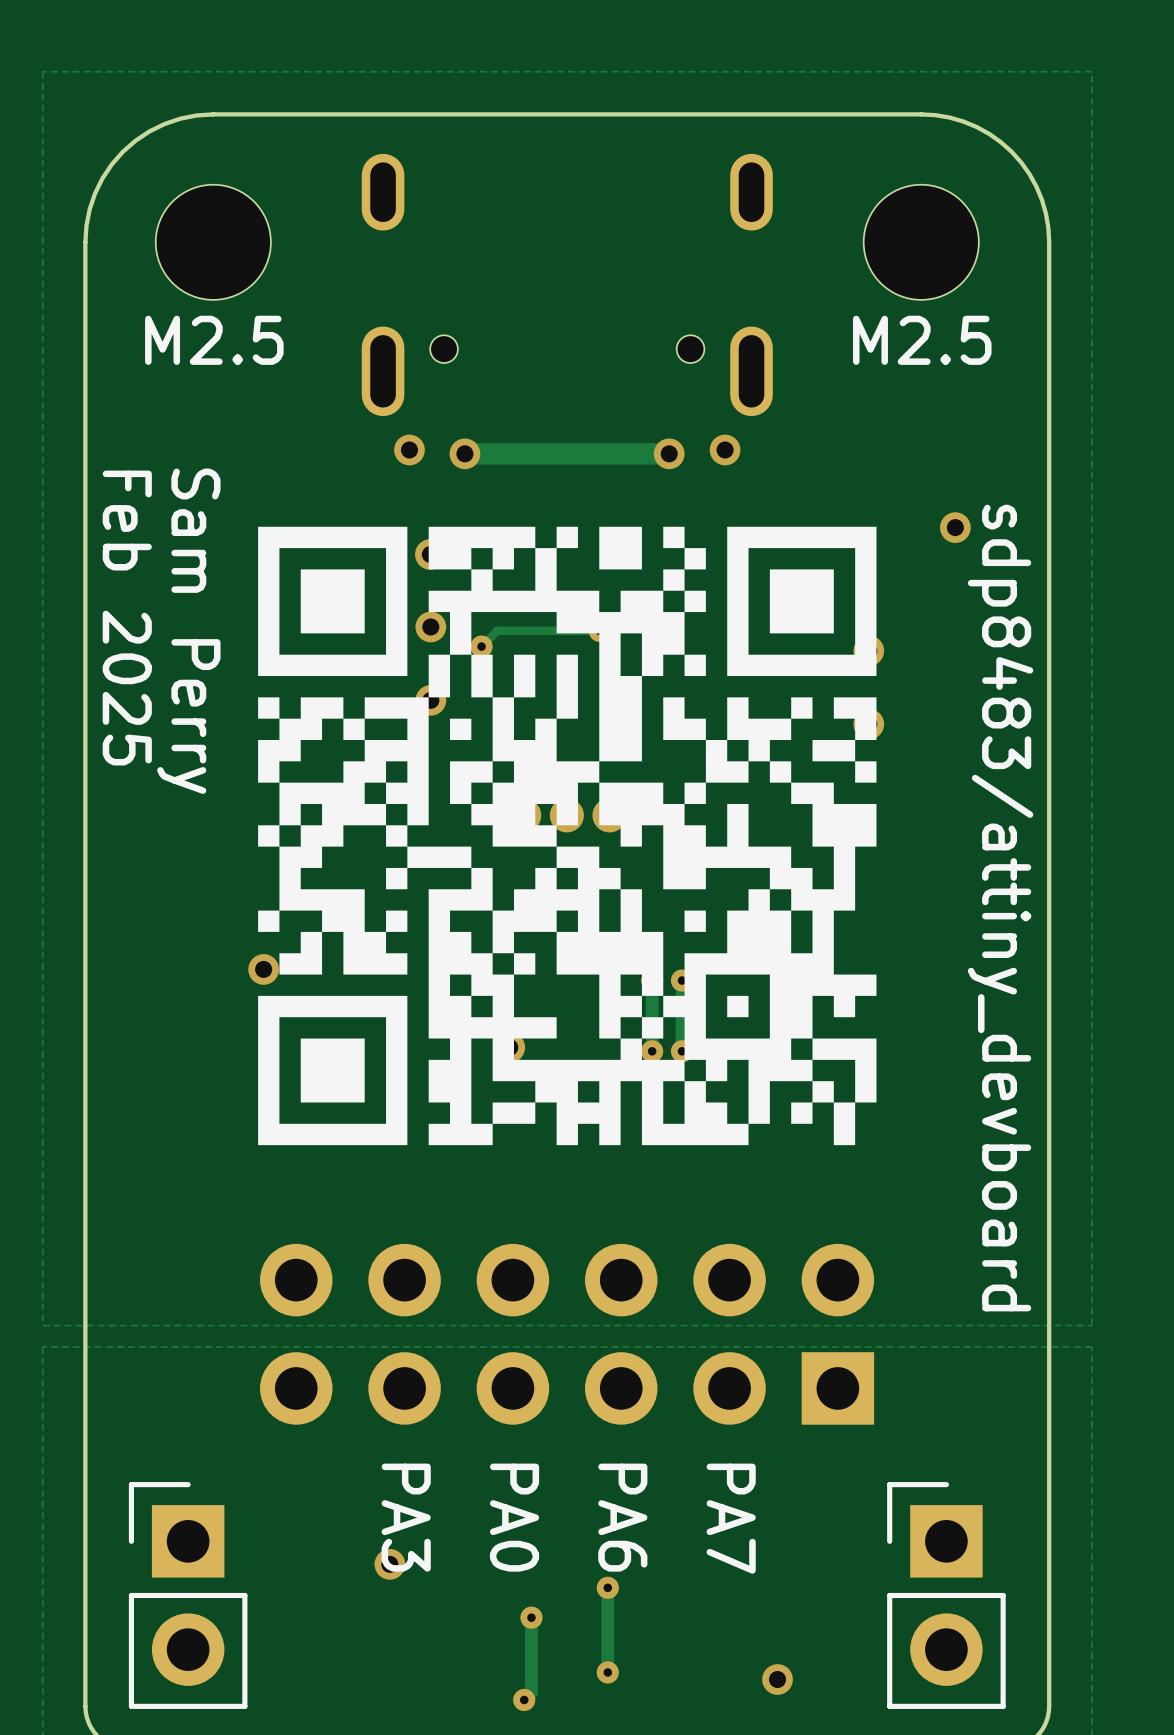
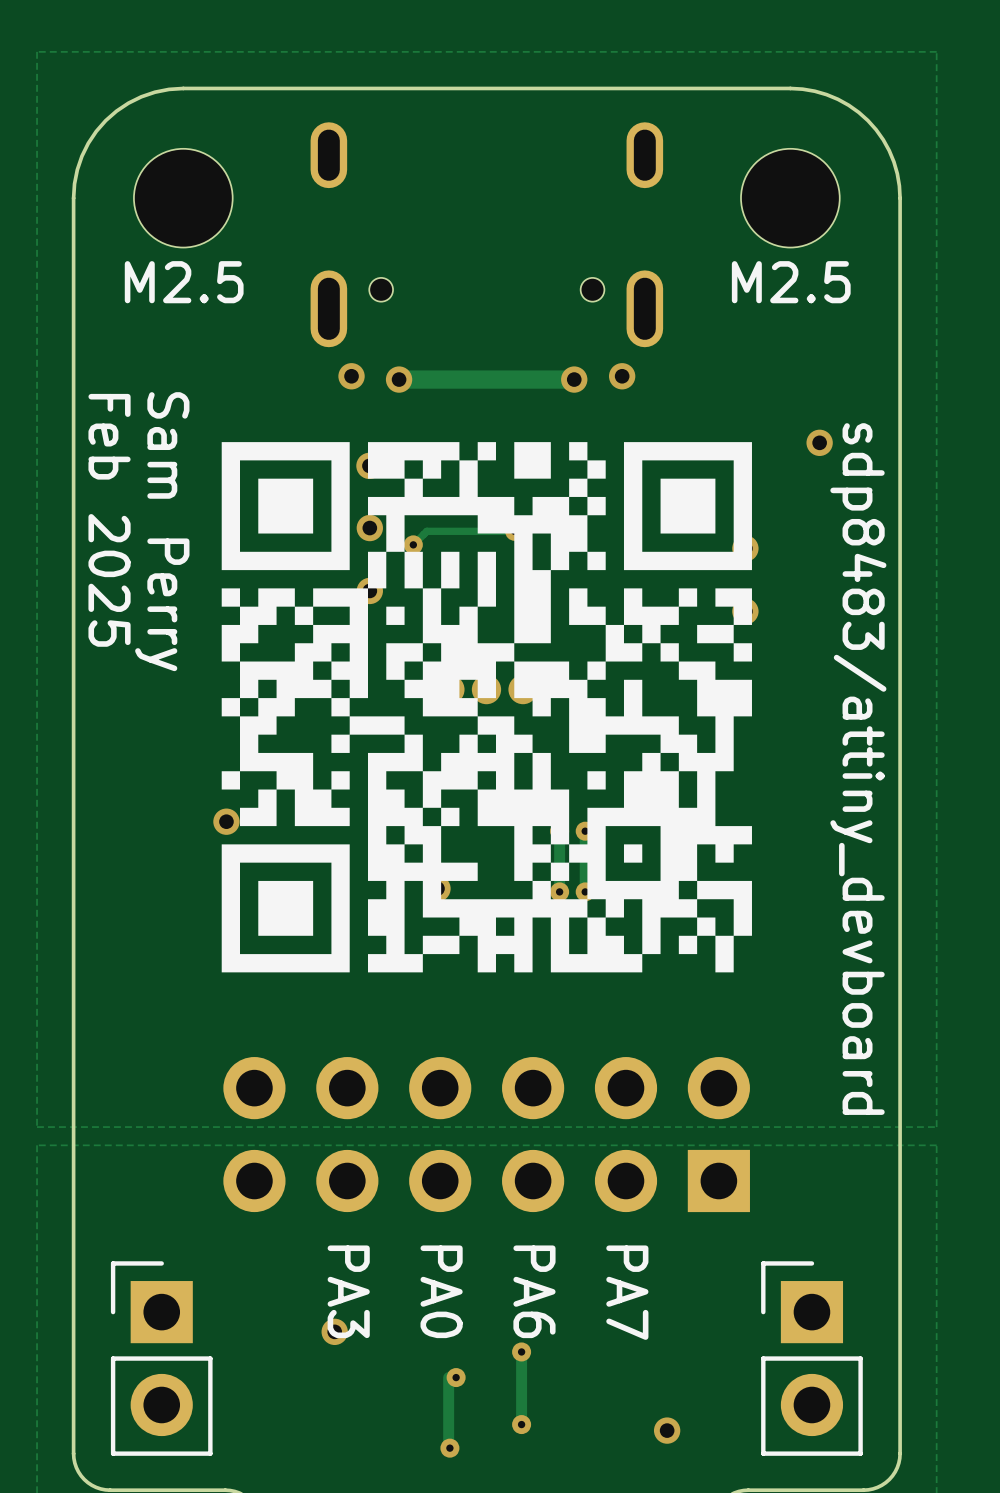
track: none -> (448, 1377) (448, 1445)
track: (531, 1617) (531, 1692) (524, 1699) -> none

